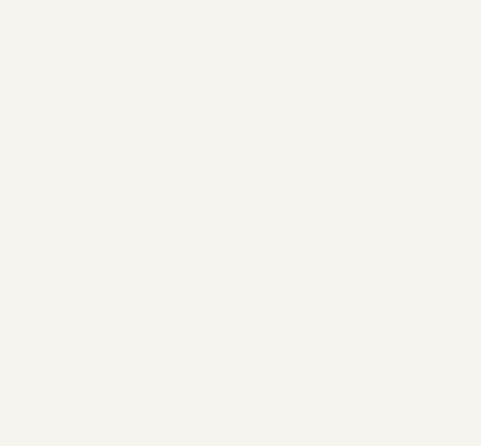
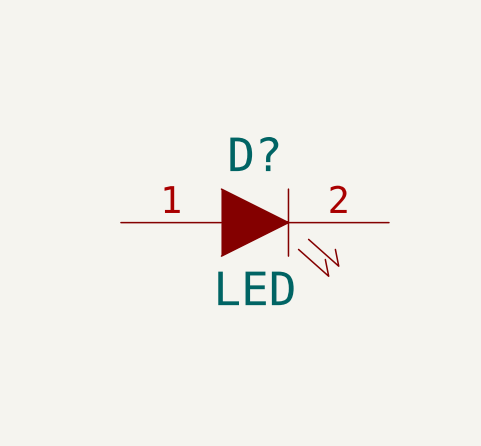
D?: none -> LED (254, 232)

